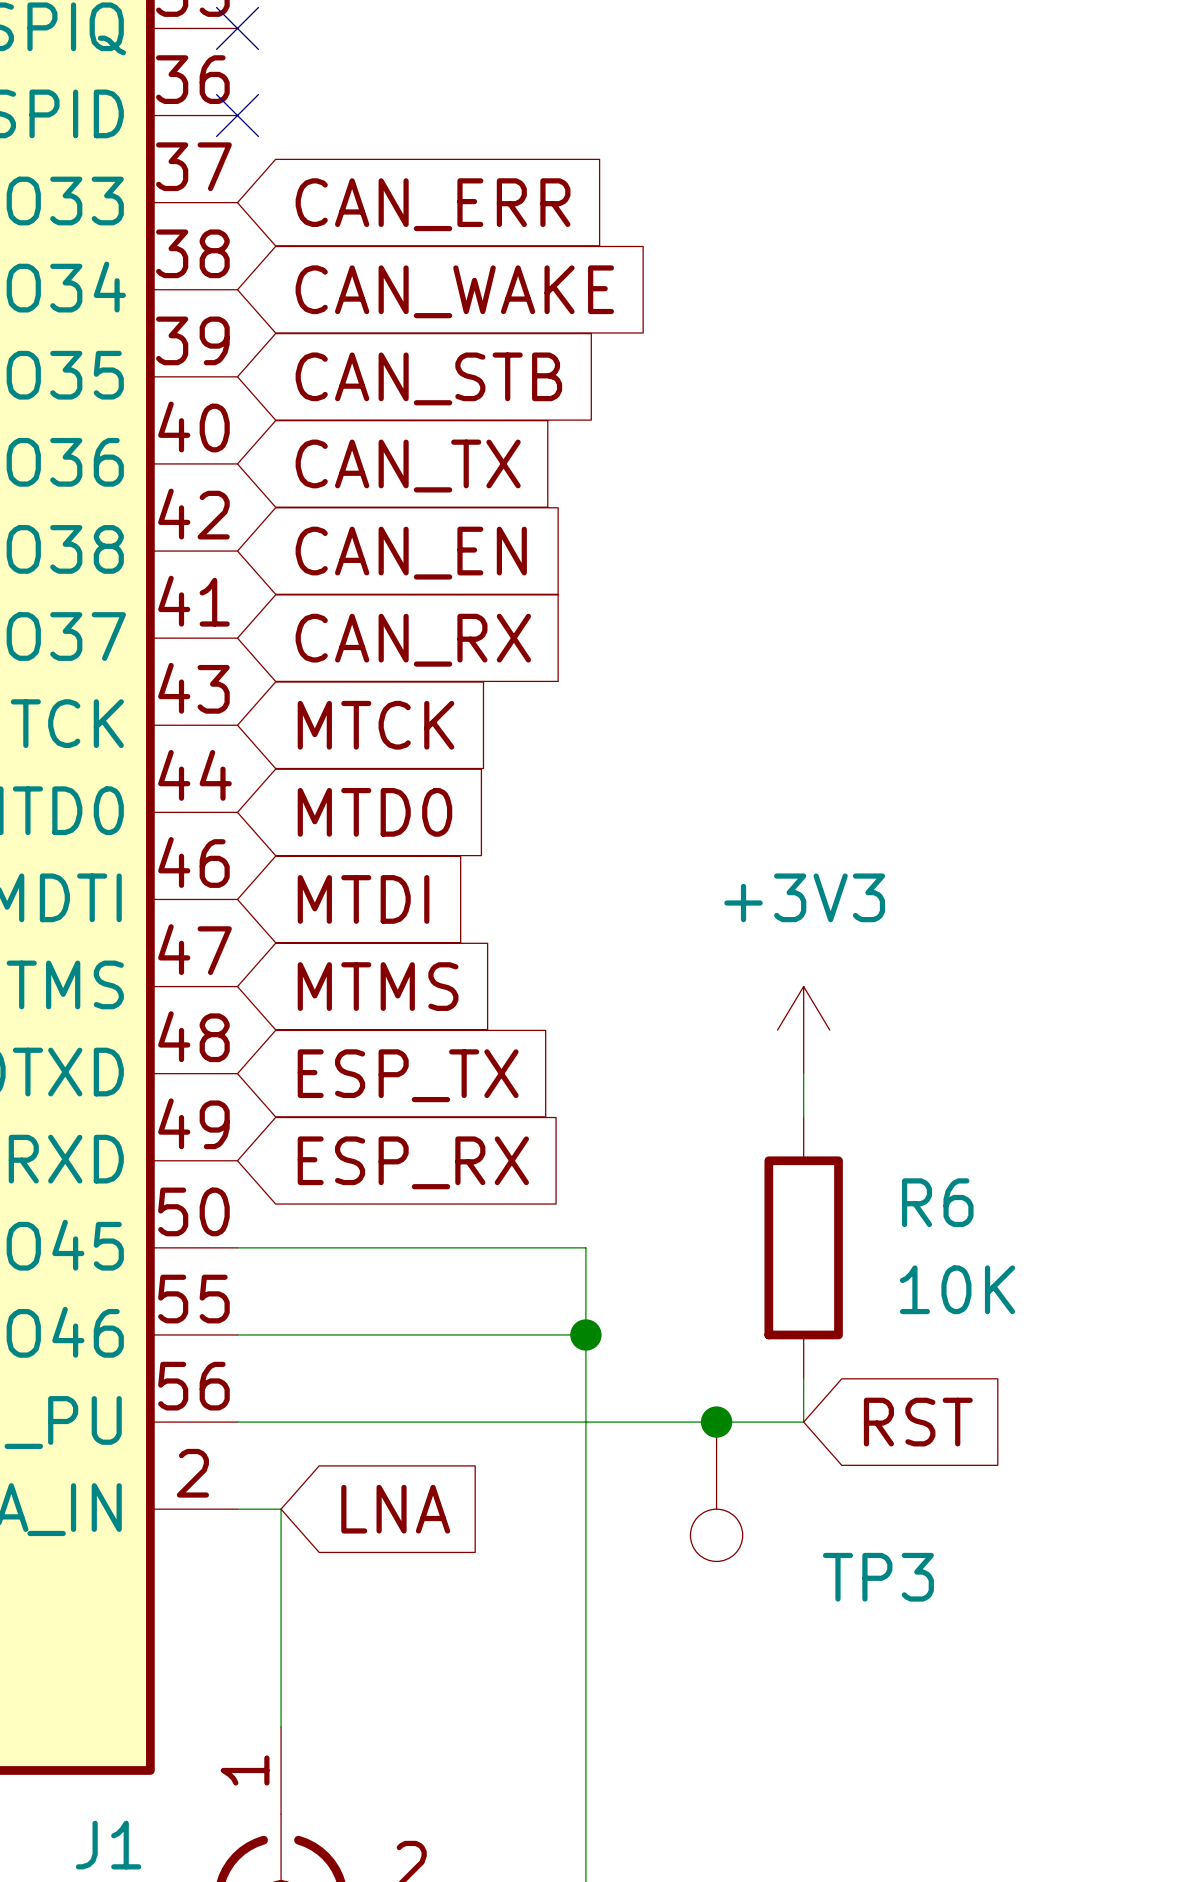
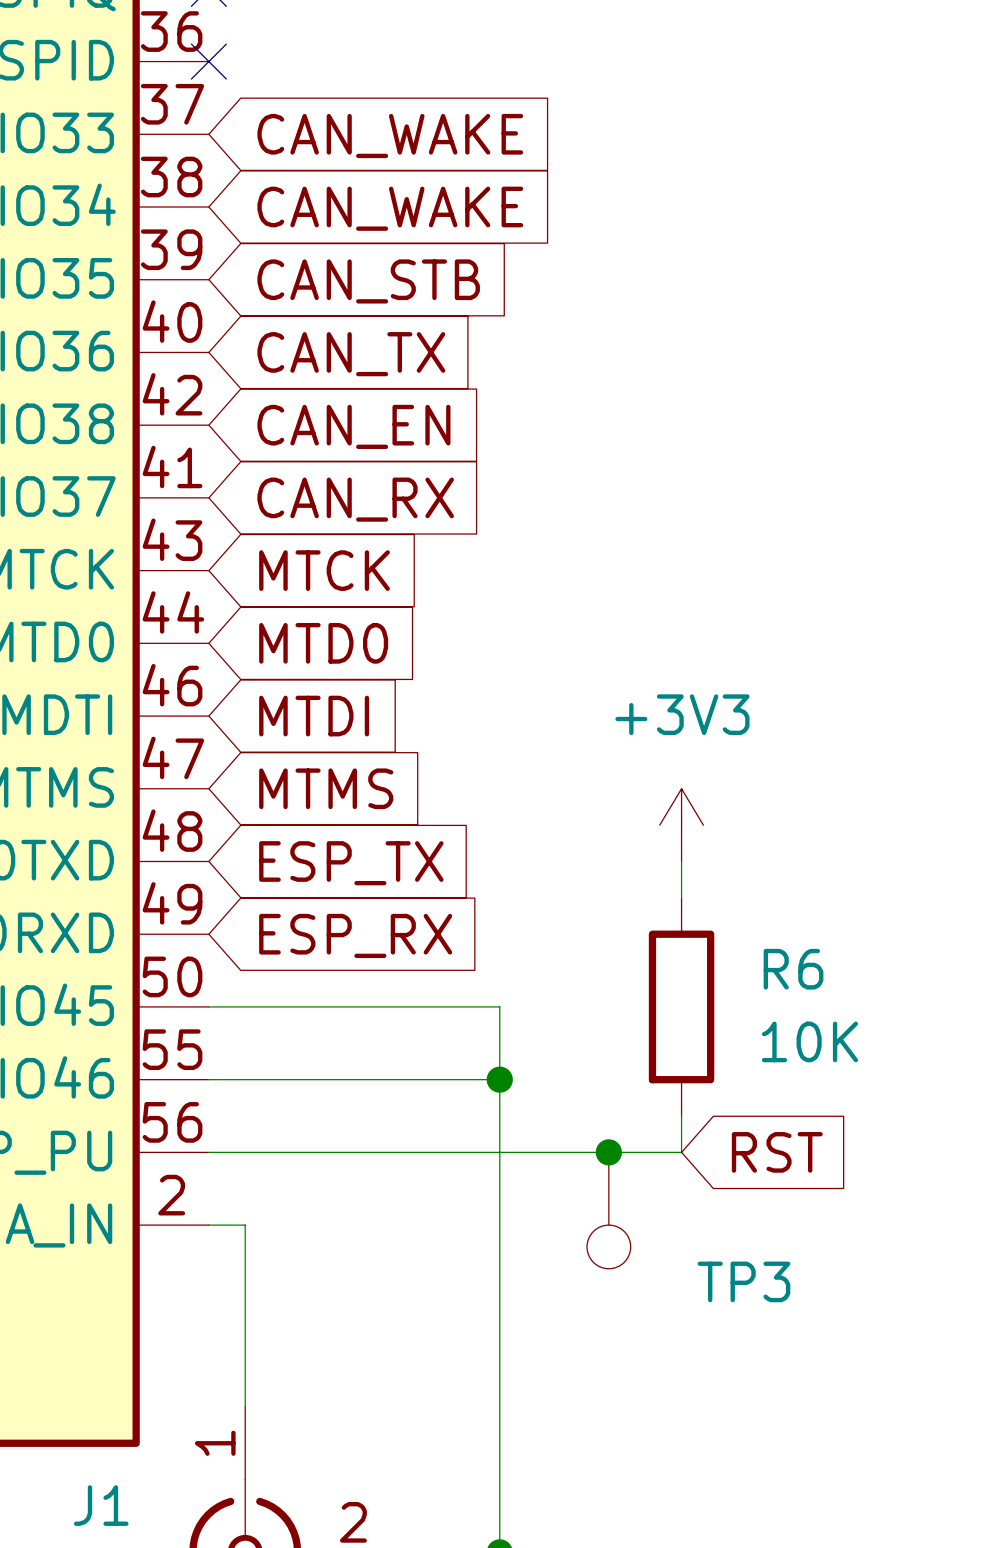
global label: CAN_ERR (433, 204) -> CAN_WAKE (390, 136)
global label: LNA (395, 1509) -> none

